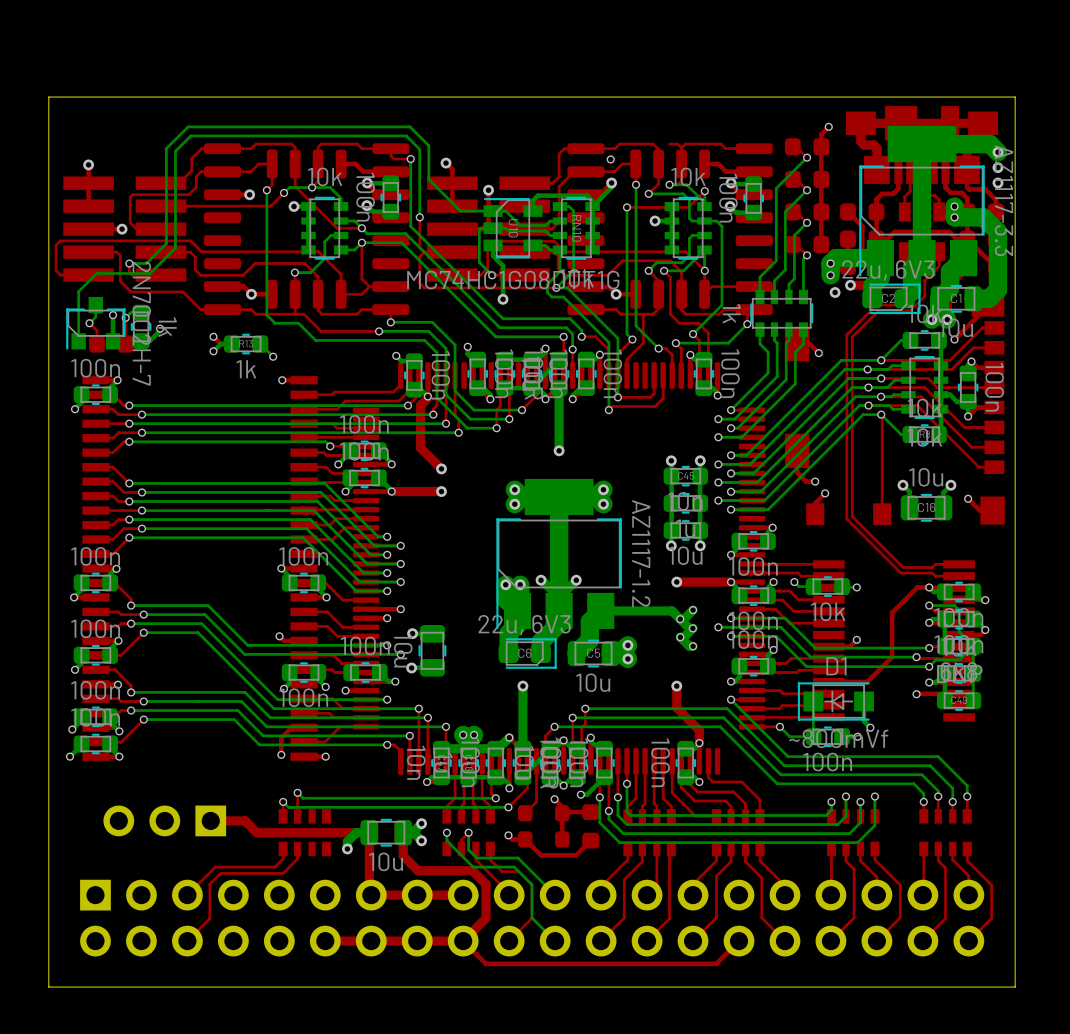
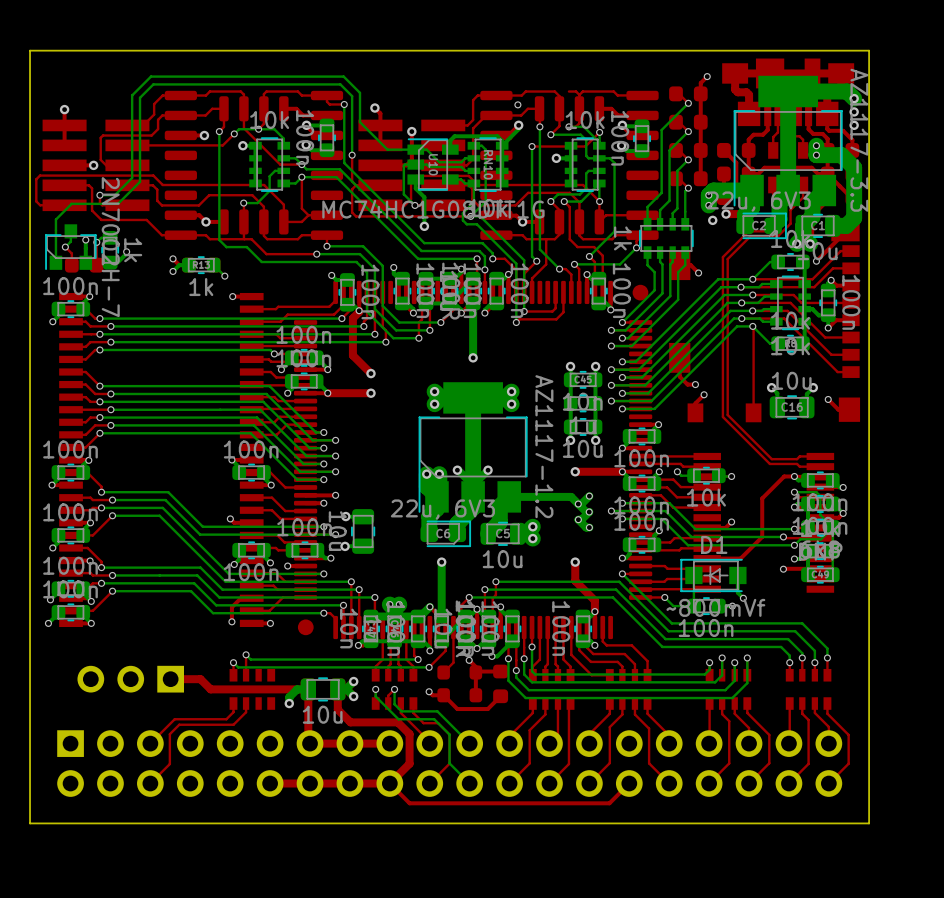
part: none -> (640, 292)
part: none -> (305, 627)

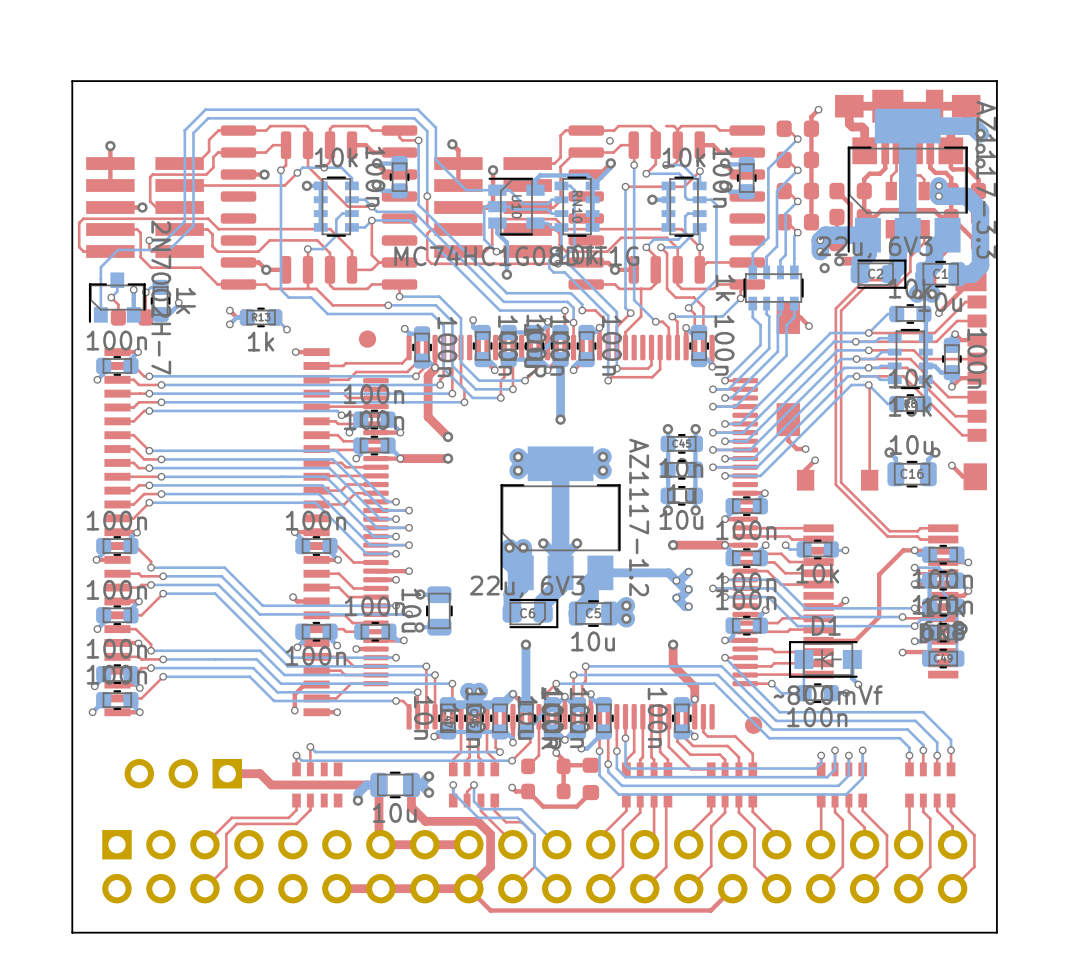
part: none -> (367, 339)
part: (640, 292) -> none
part: (305, 627) -> none
part: none -> (753, 725)

